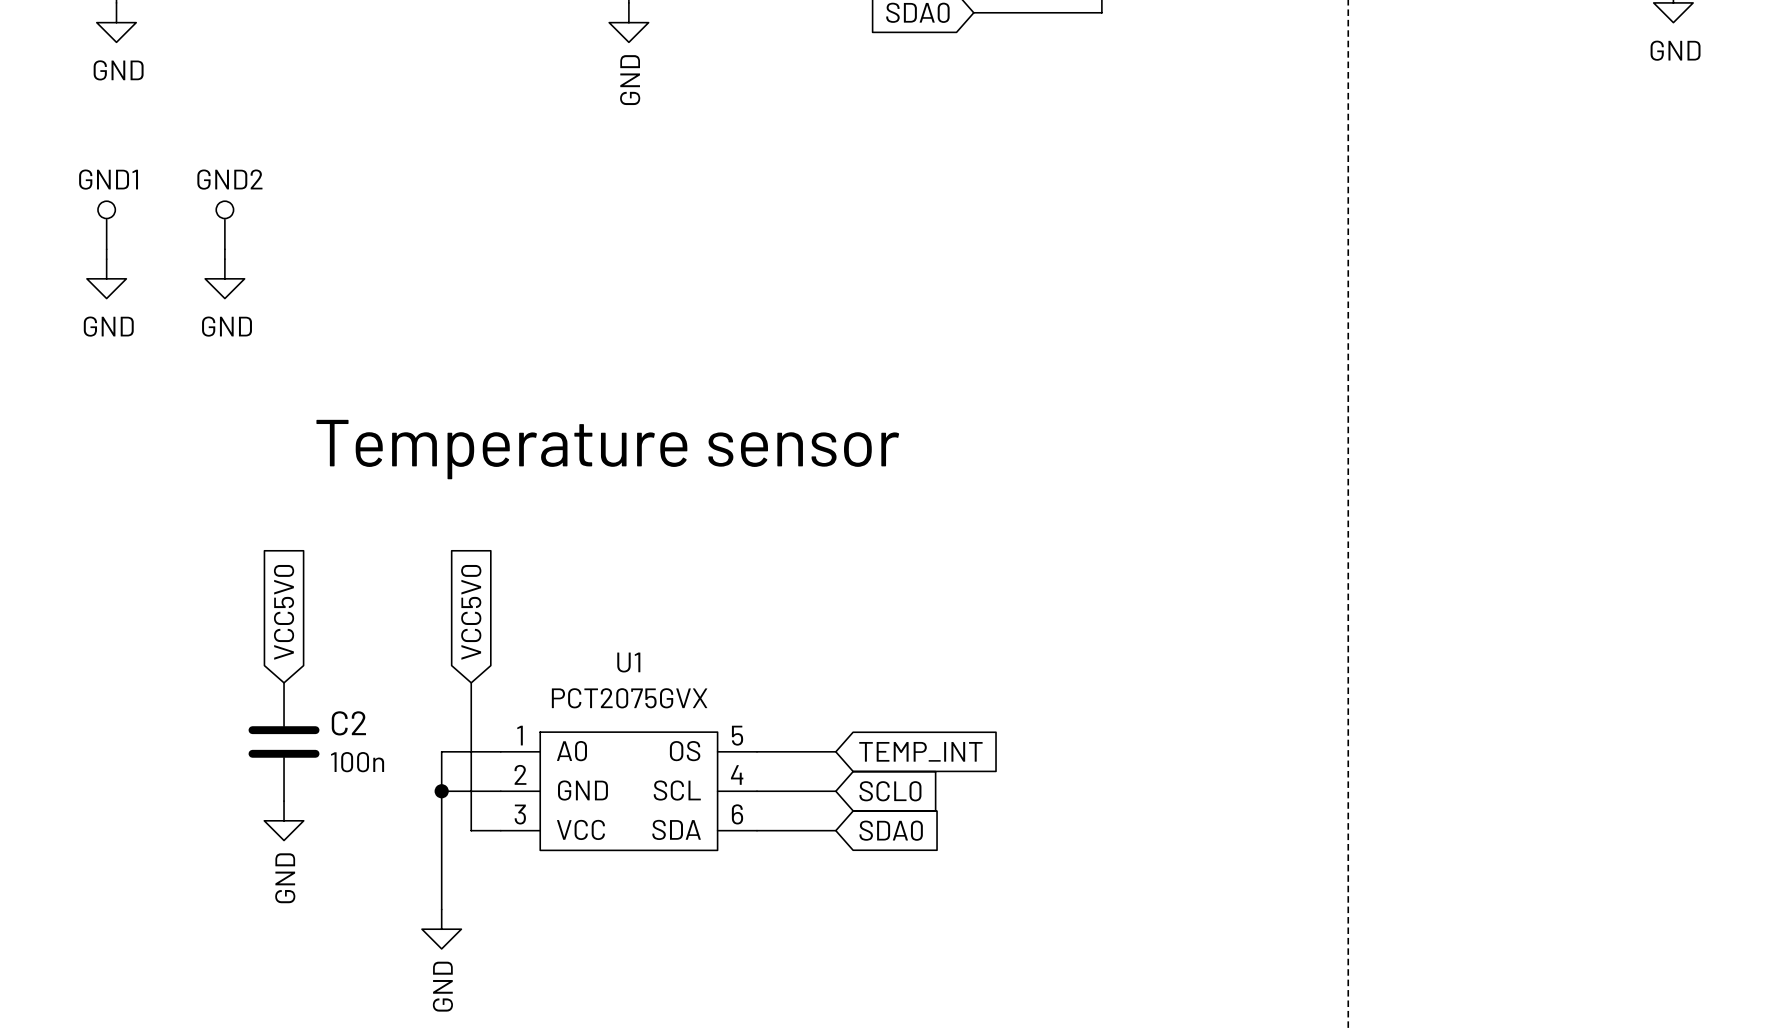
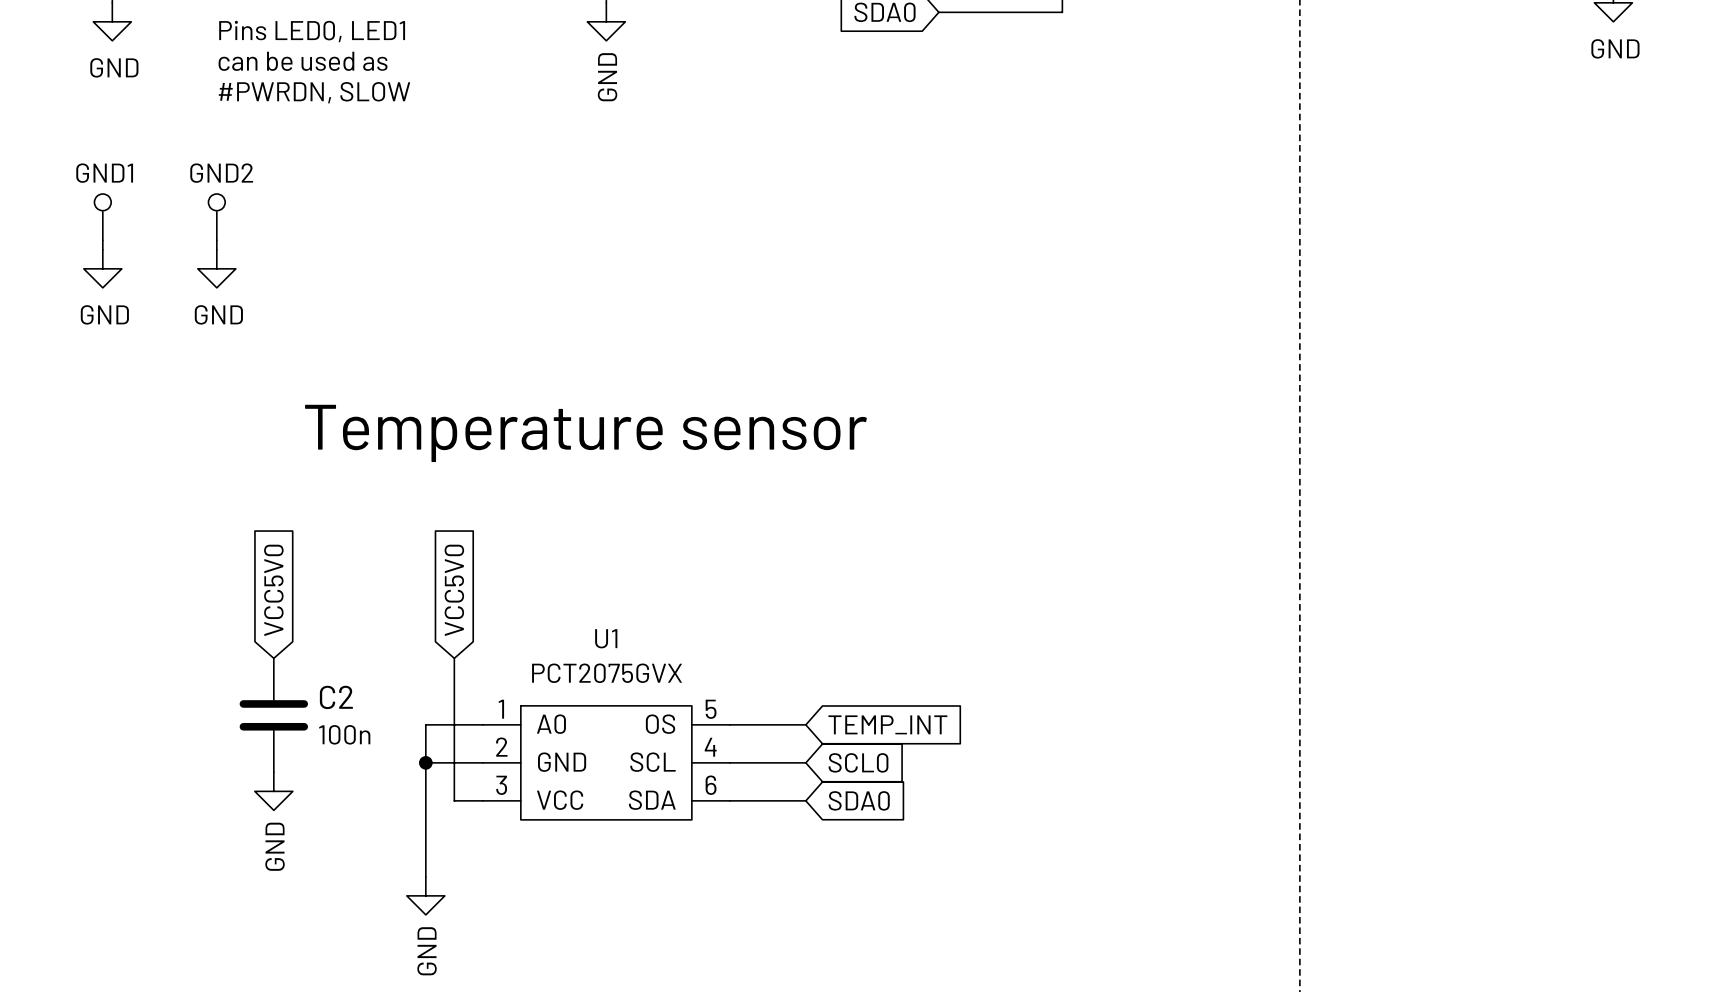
text: none -> Pins LED0, LED1 (312, 31)
text: none -> can be used as (303, 61)
text: none -> #PWRDN, SLOW (314, 92)

